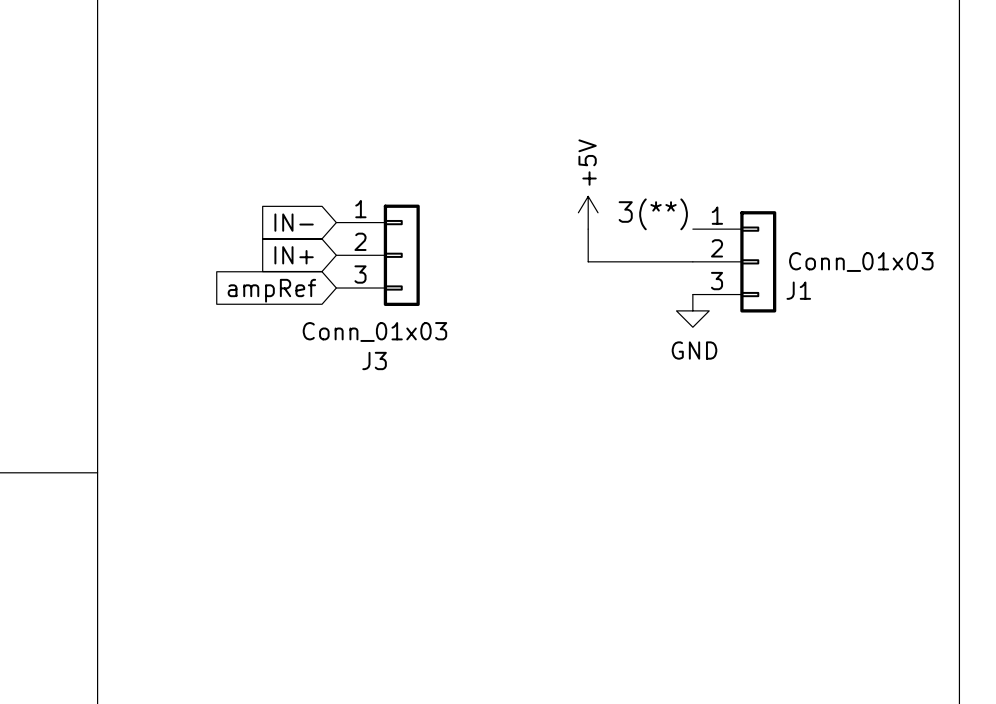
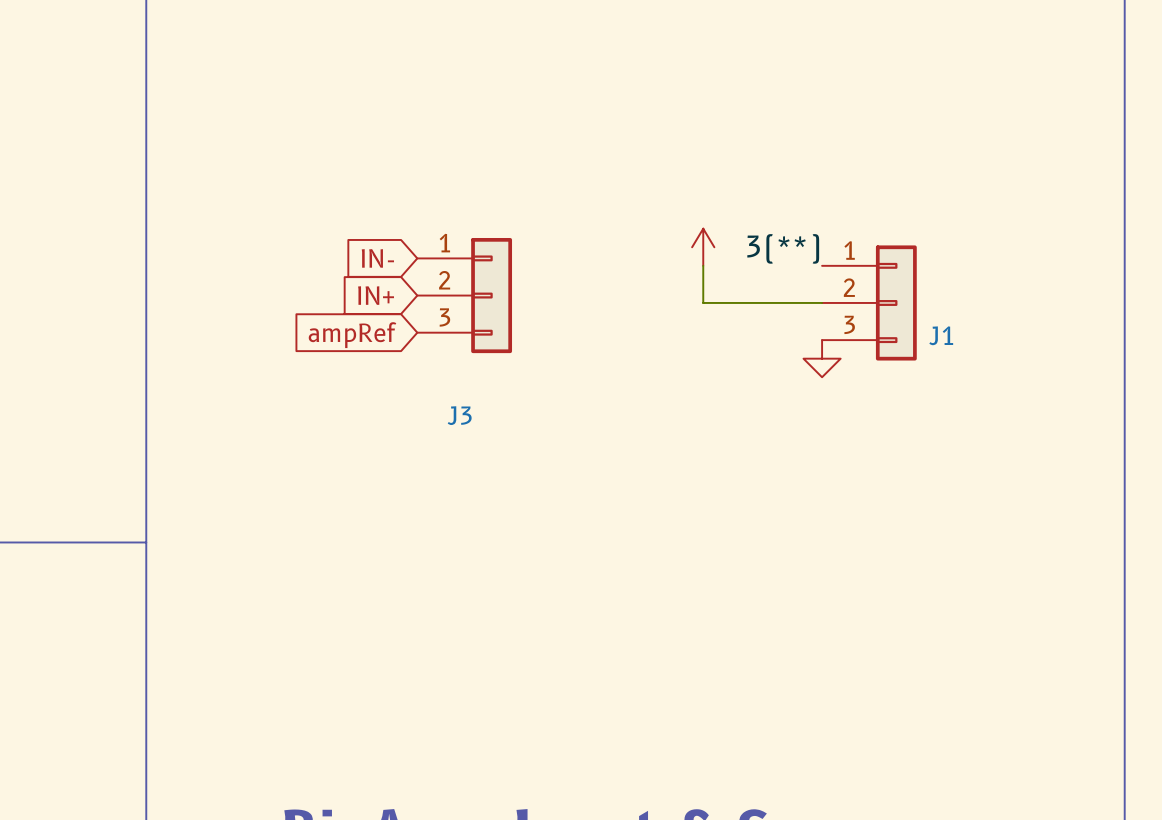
power symbol text: +5V (587, 162) -> none
J1 value: Conn_01x03 (861, 262) -> none
J3 value: Conn_01x03 (374, 332) -> none
power symbol text: GND (694, 350) -> none

